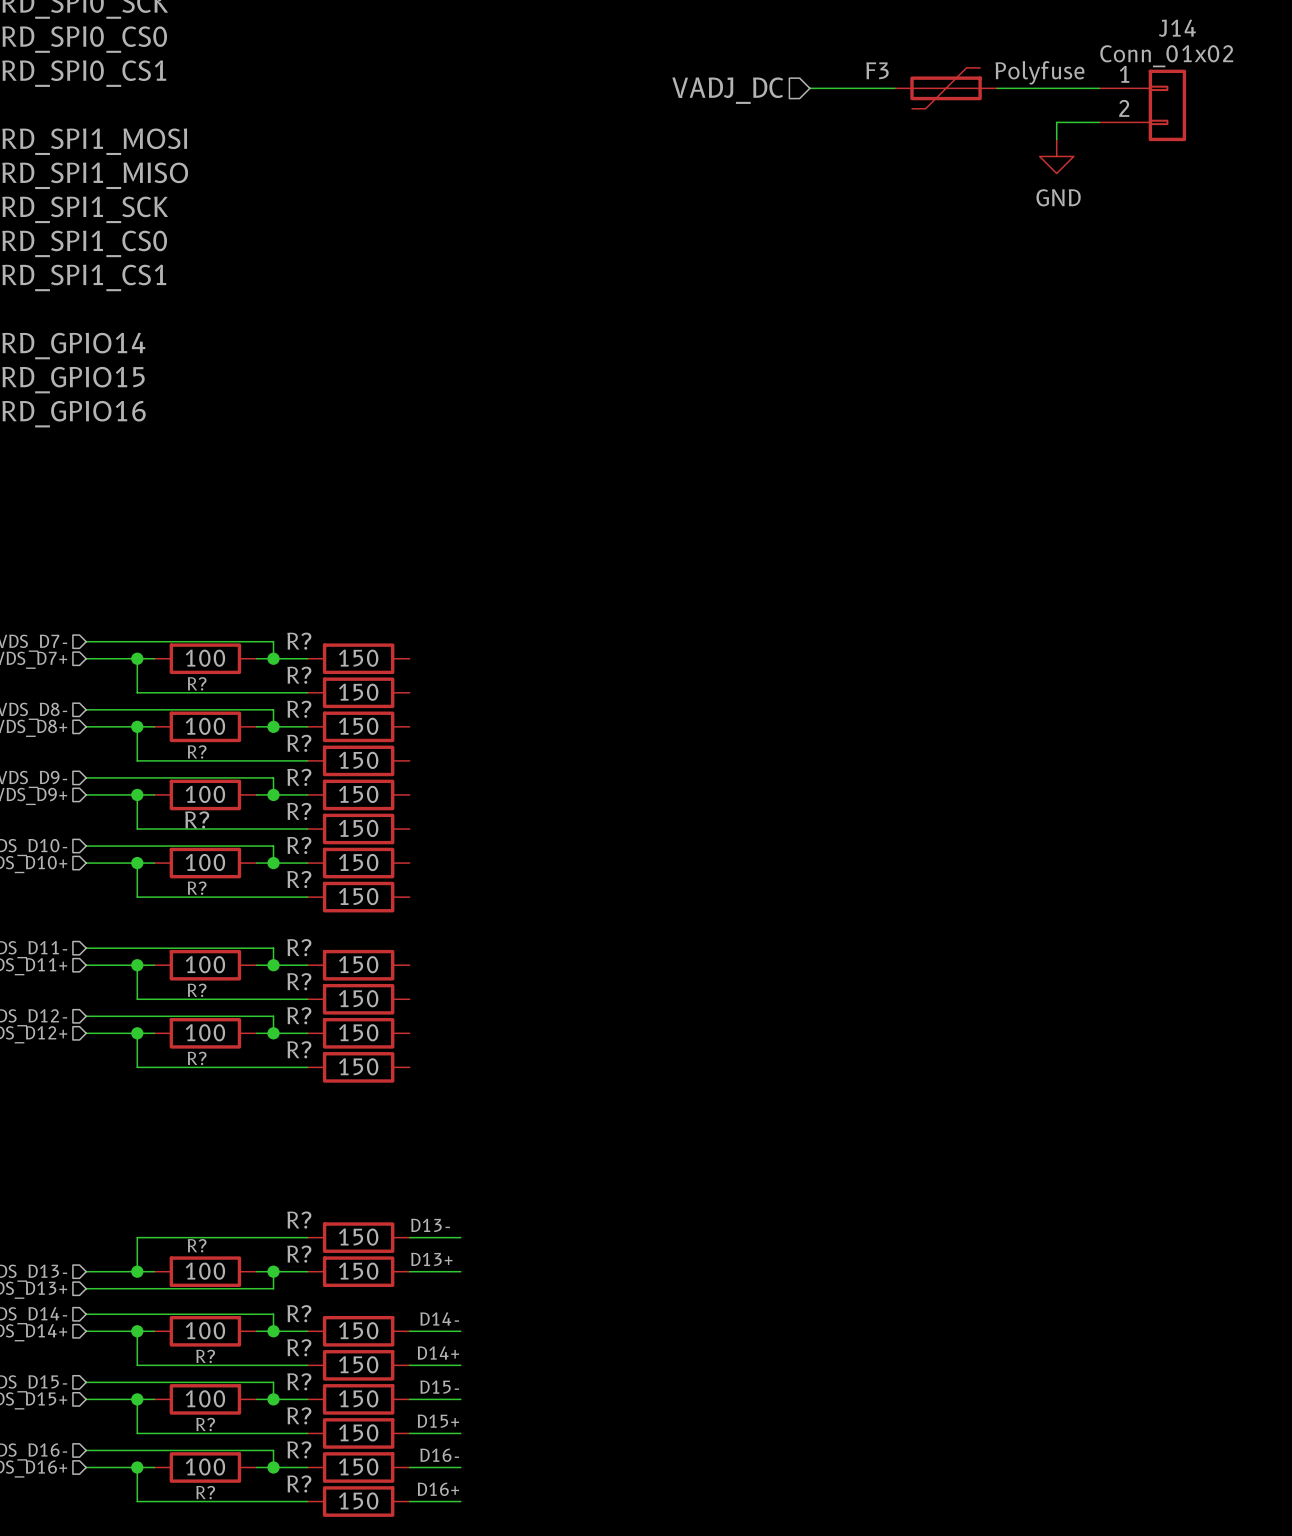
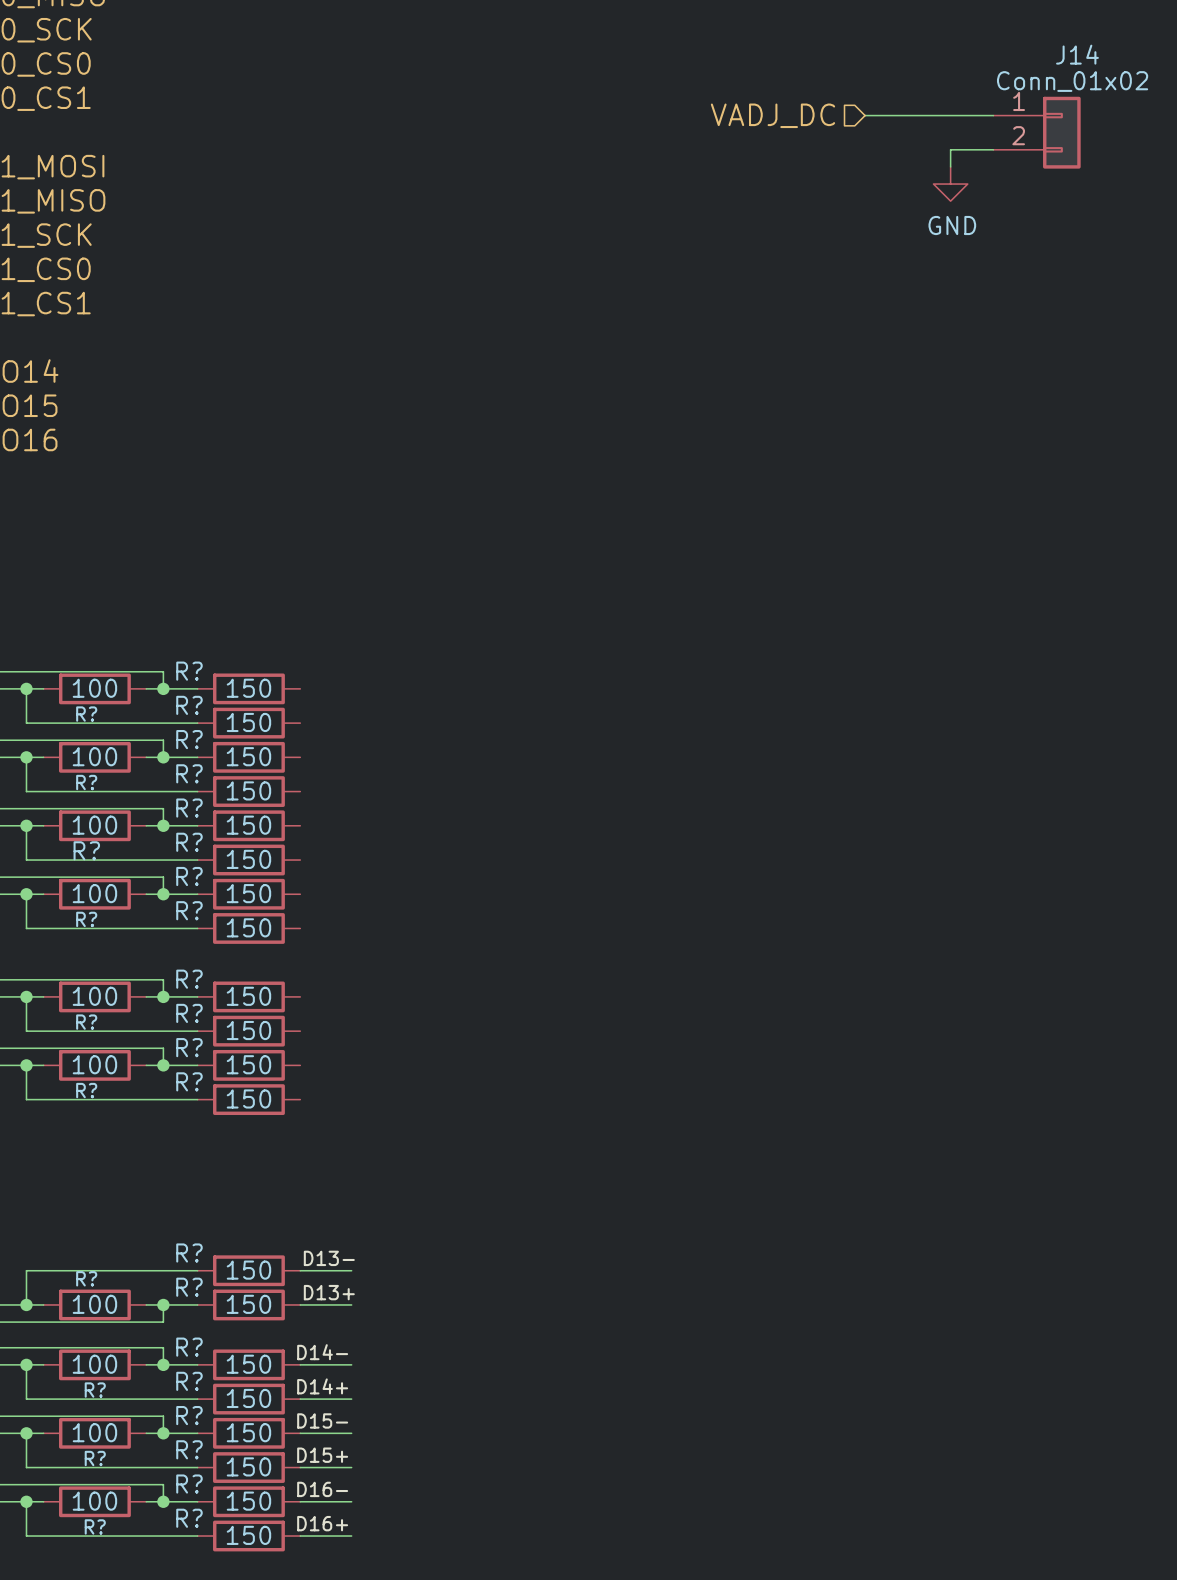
wire: (809, 88) (894, 88) -> none
F3: Polyfuse (946, 88) -> none
hierarchical label position: VADJ_DC (727, 90) -> VADJ_DC (772, 115)

